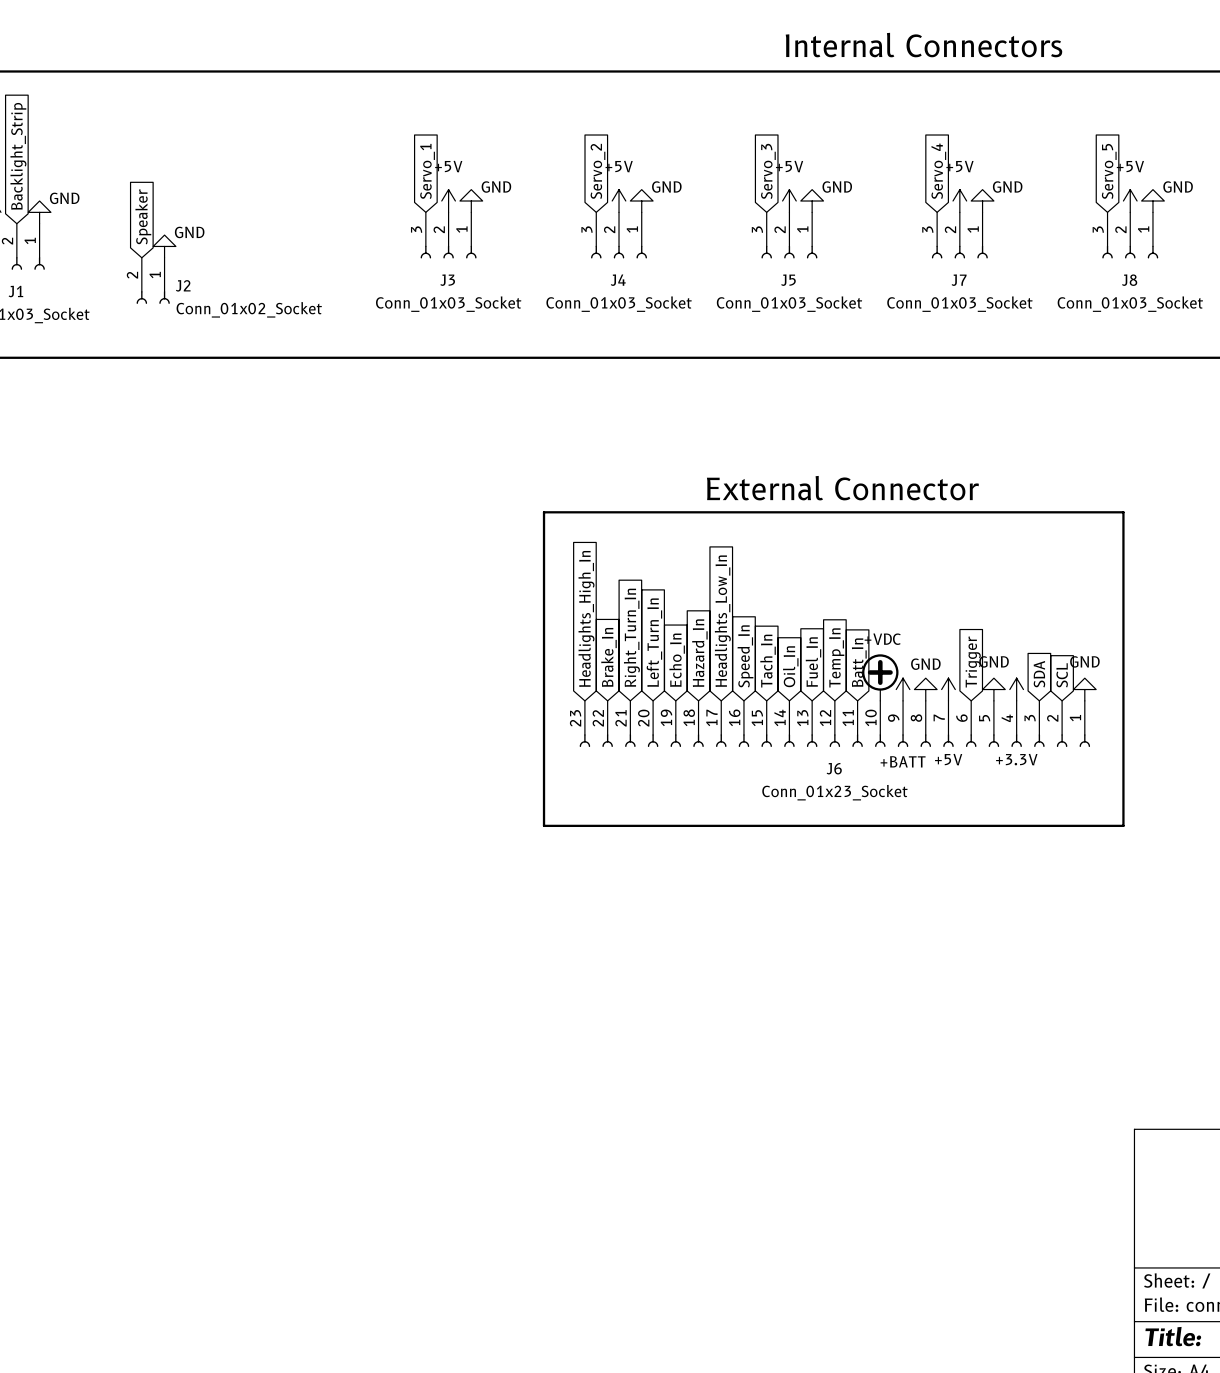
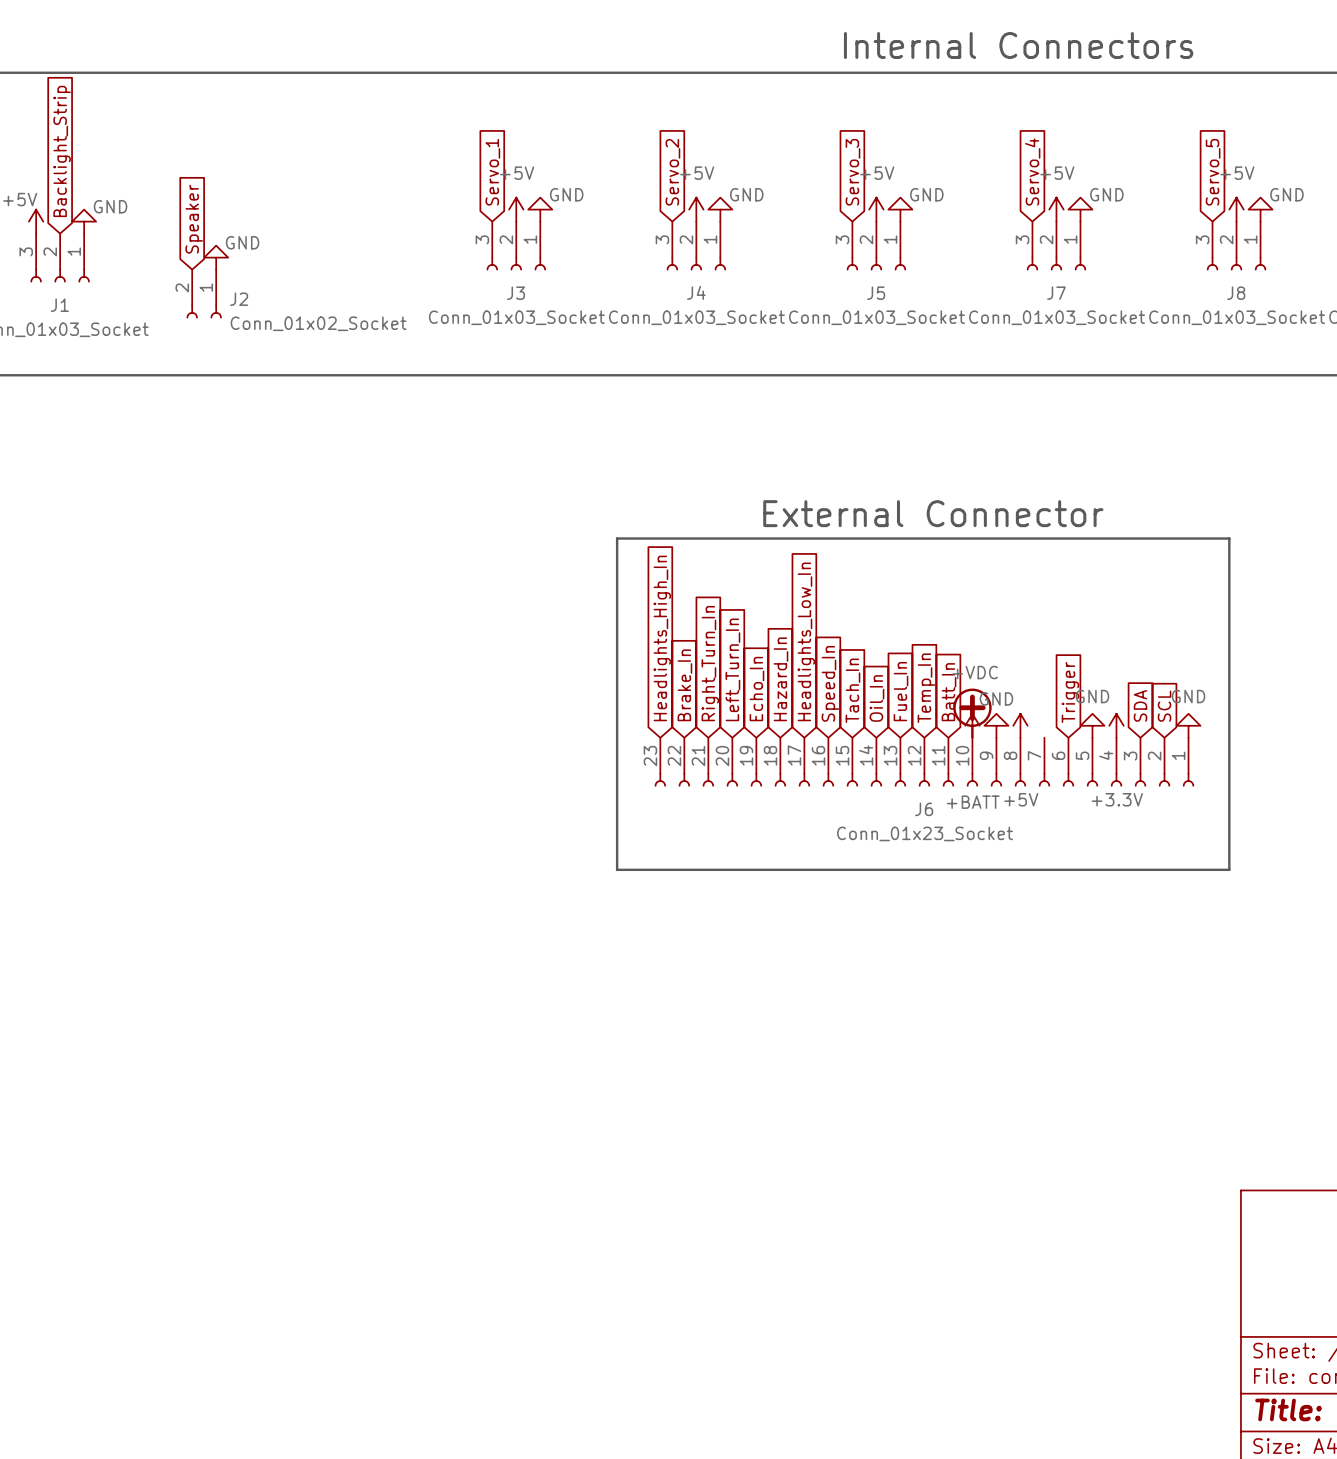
power symbol: none -> +BATT (972, 725)
power symbol: +BATT (903, 689) -> GND (996, 725)
power symbol: GND (925, 689) -> +5V (1020, 725)
power symbol: +5V (948, 689) -> none

